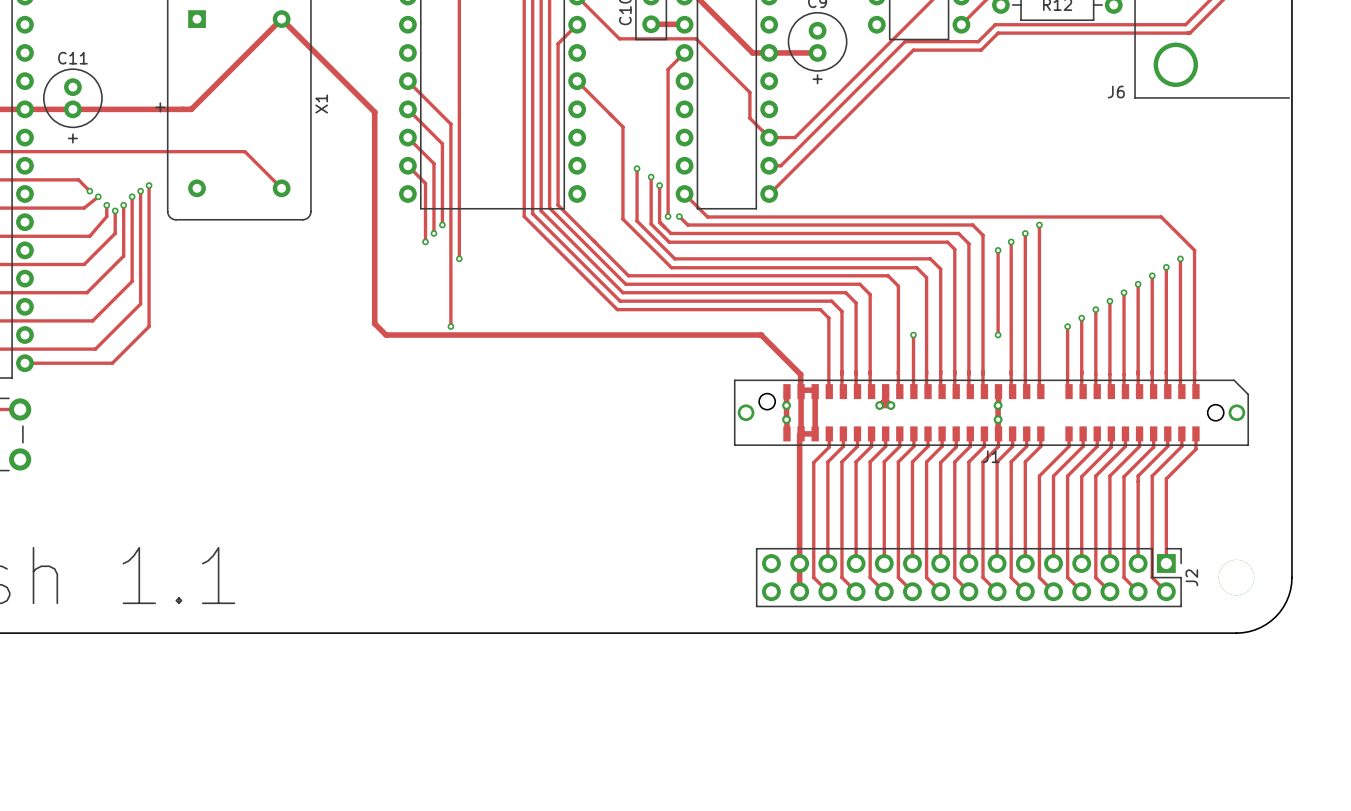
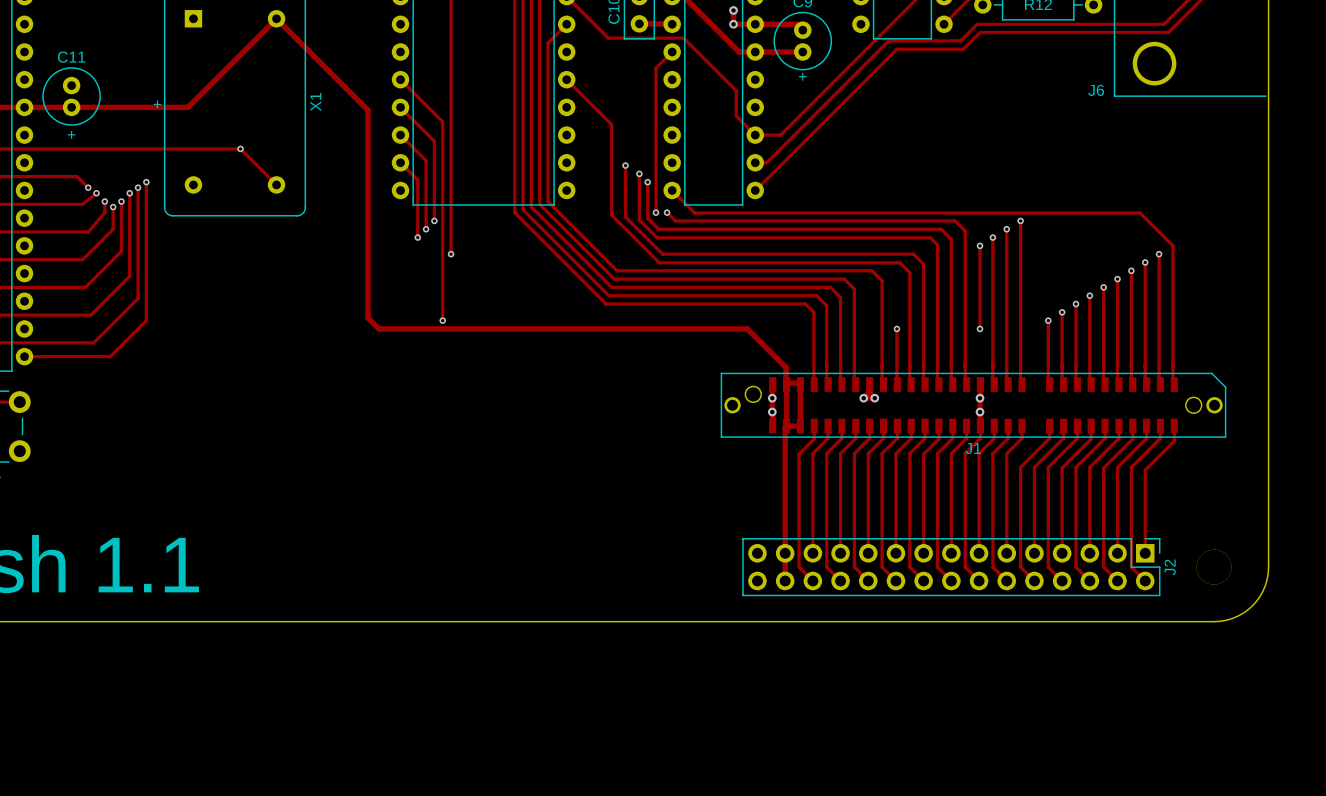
track: none -> (733, 10) (733, 24) (796, 24) (802, 30)
via: none -> (733, 10)
via: none -> (733, 24)
via: none -> (240, 148)

